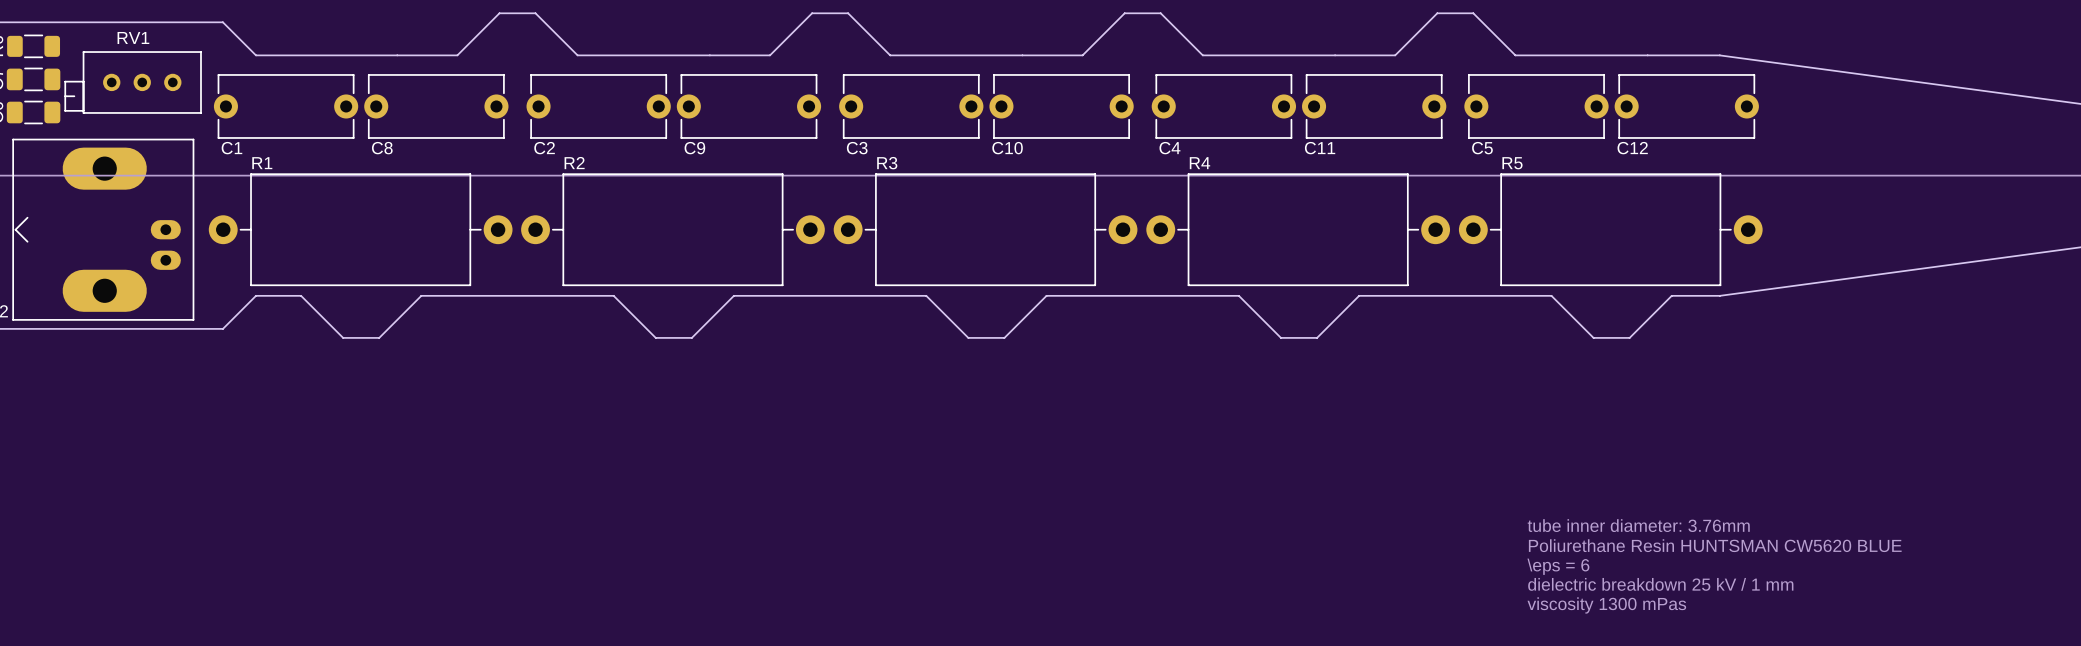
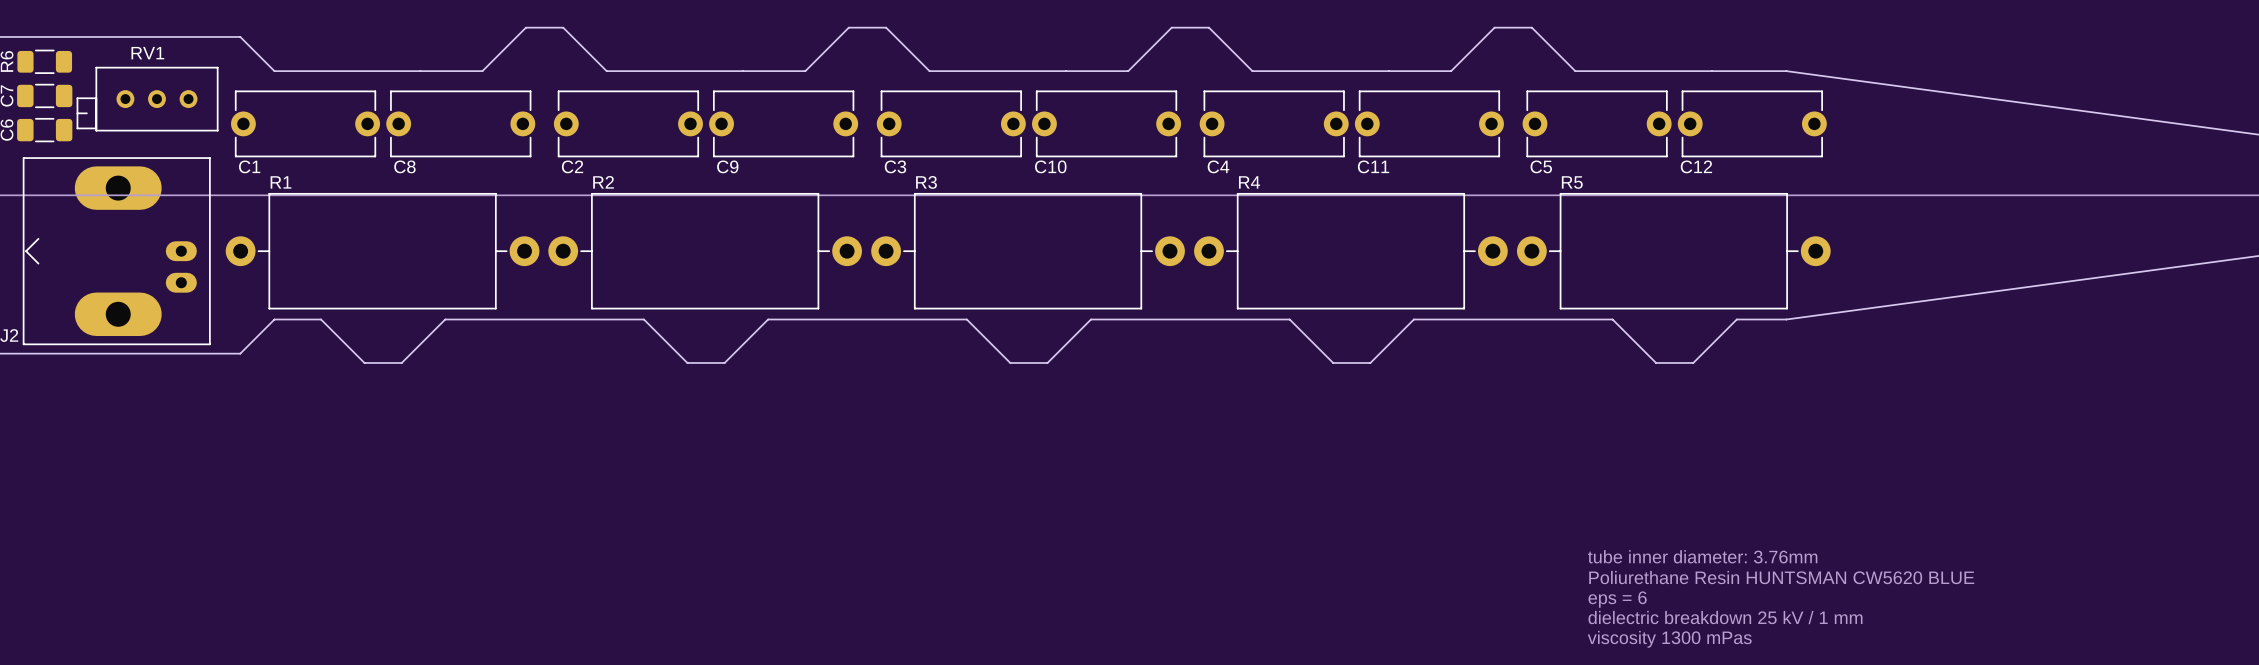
text: \eps = 6 (1558, 566) -> eps = 6 (1617, 599)

